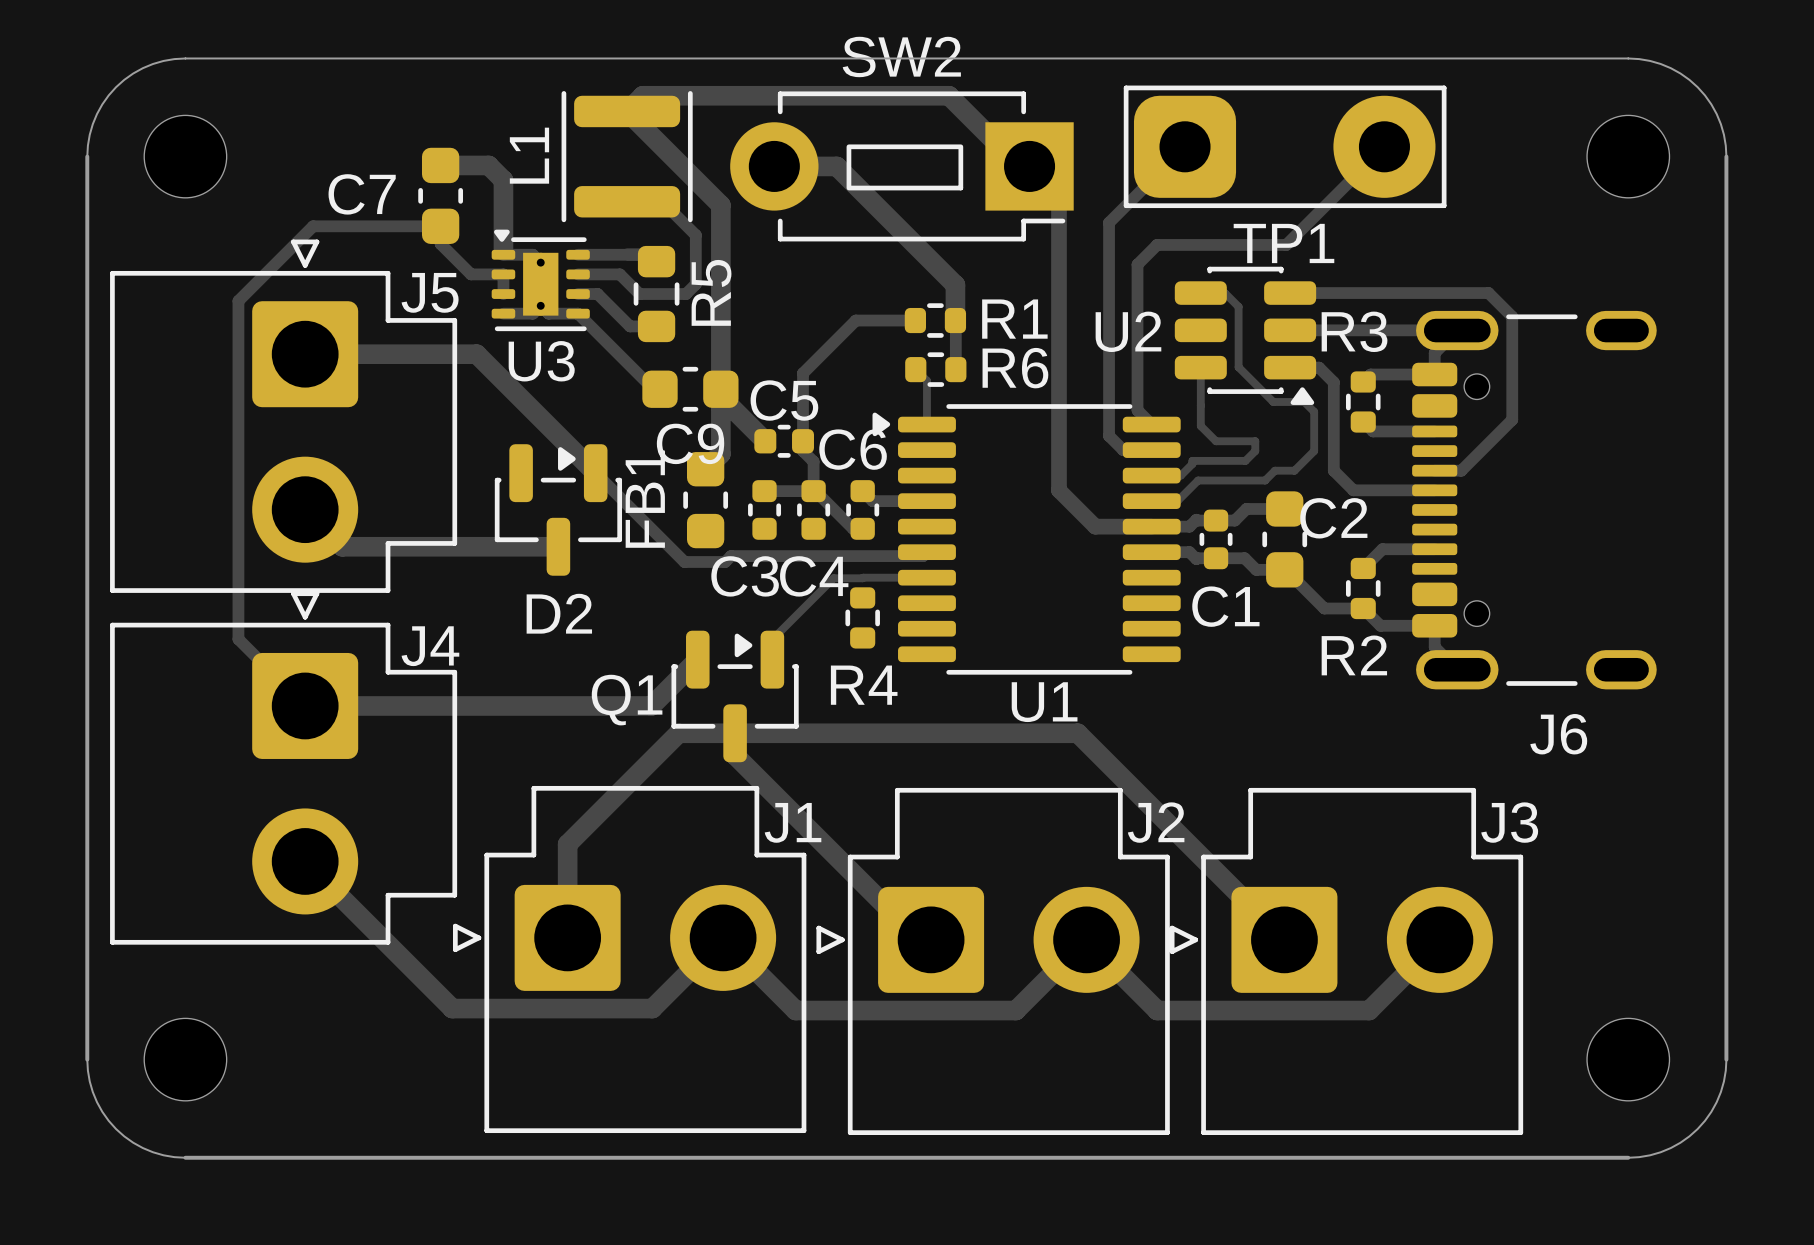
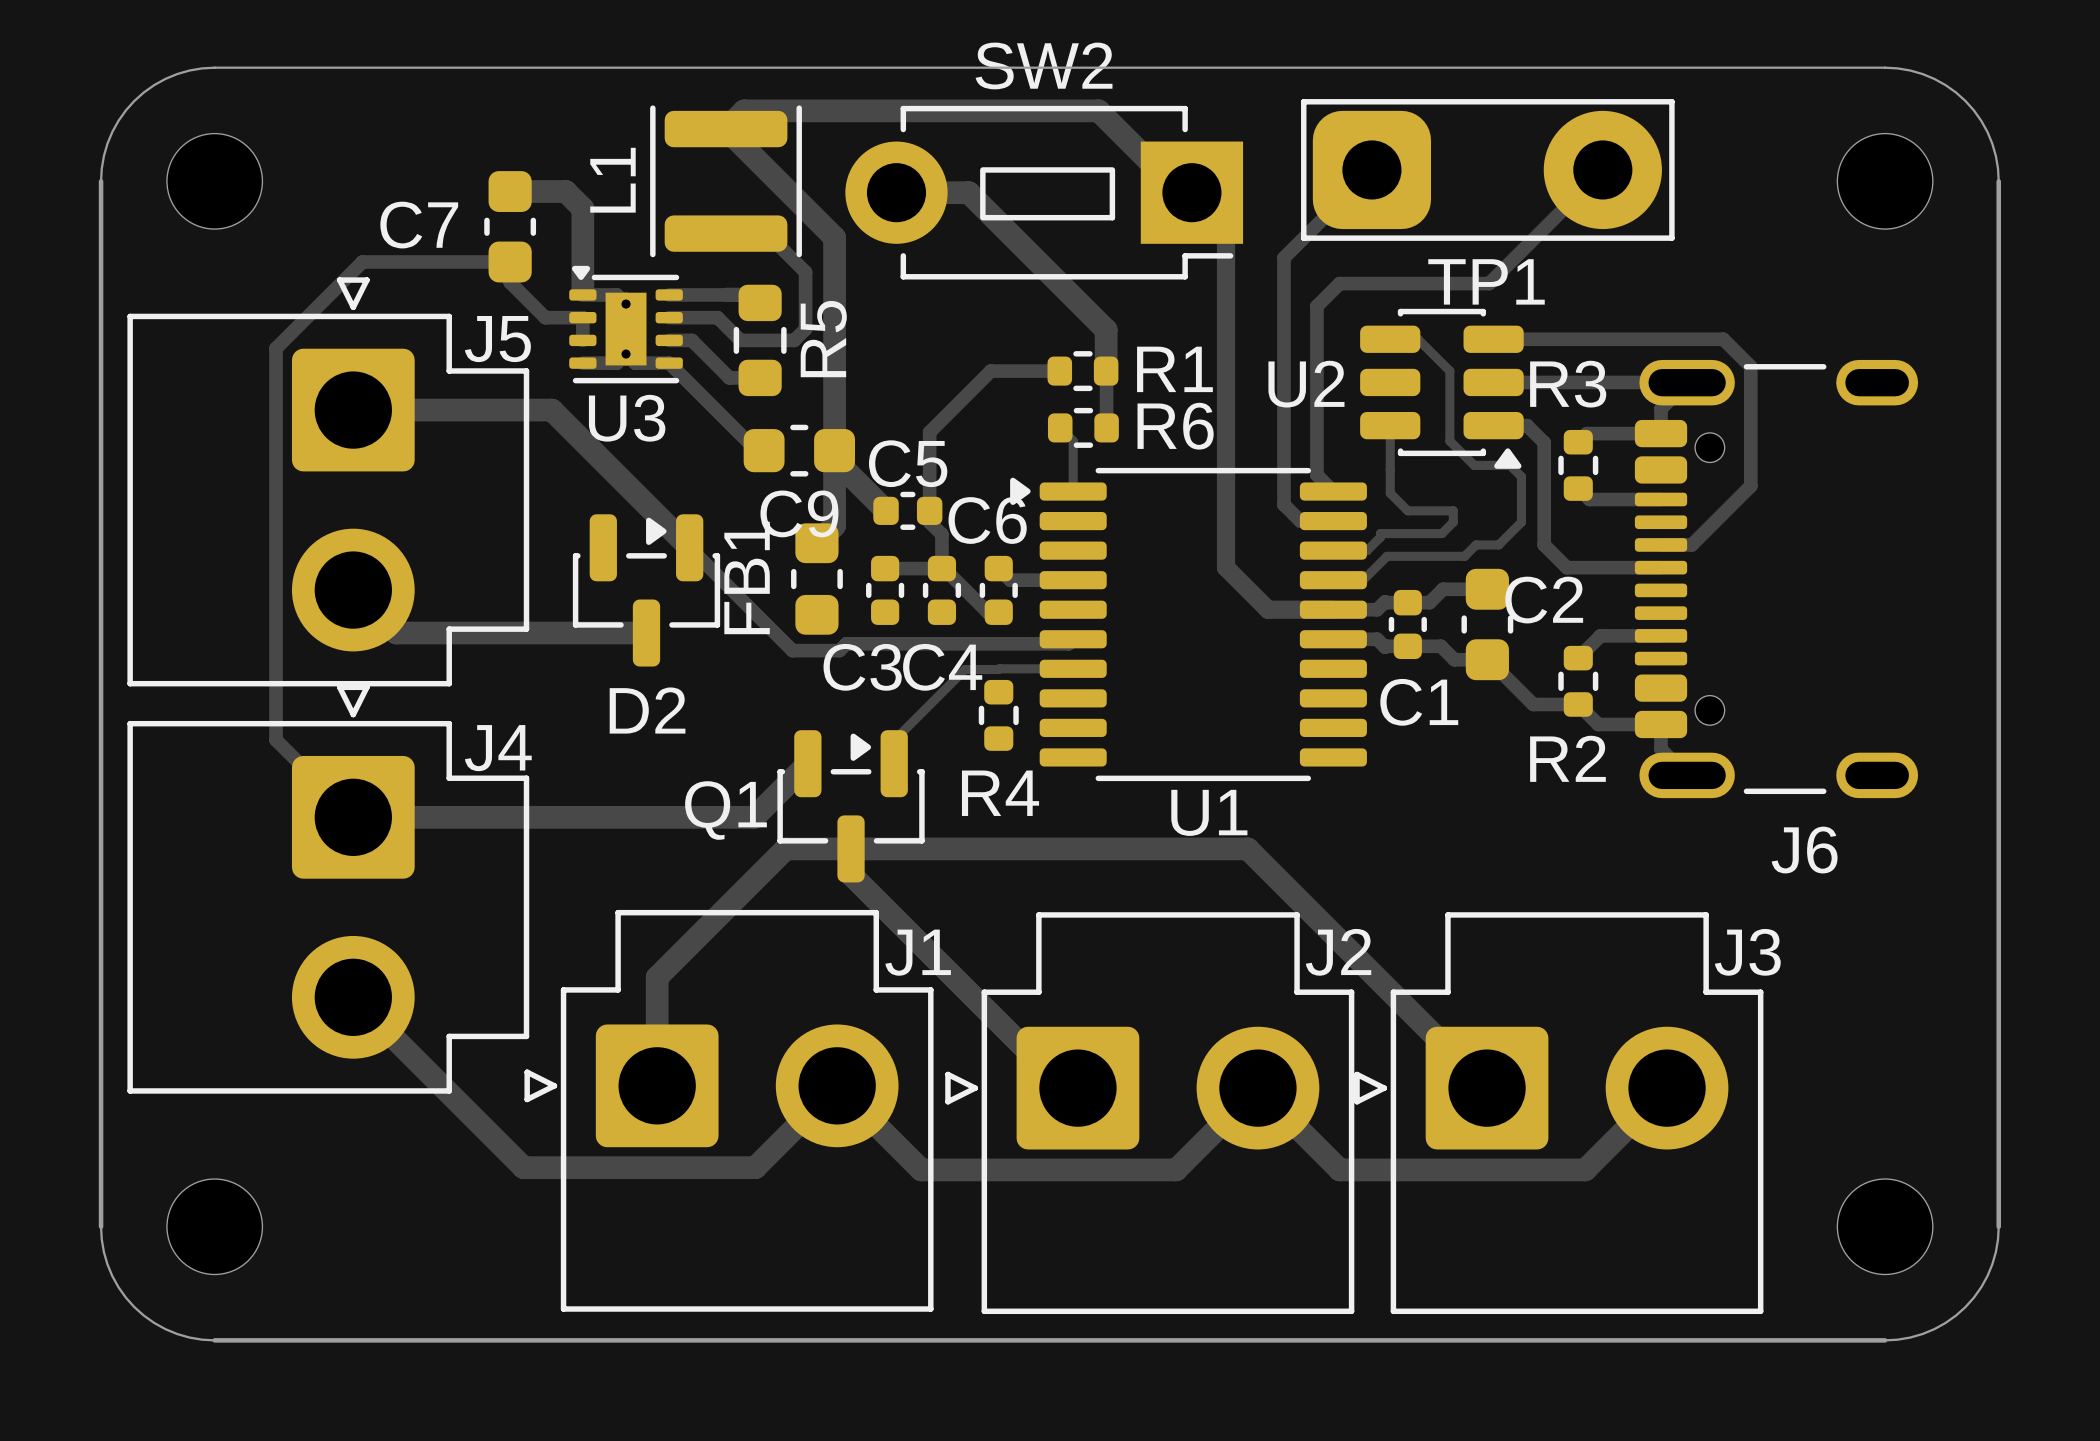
track: (1238, 306) (1238, 367) (1252, 381) -> (1433, 355) (1449, 371) (1449, 441)

